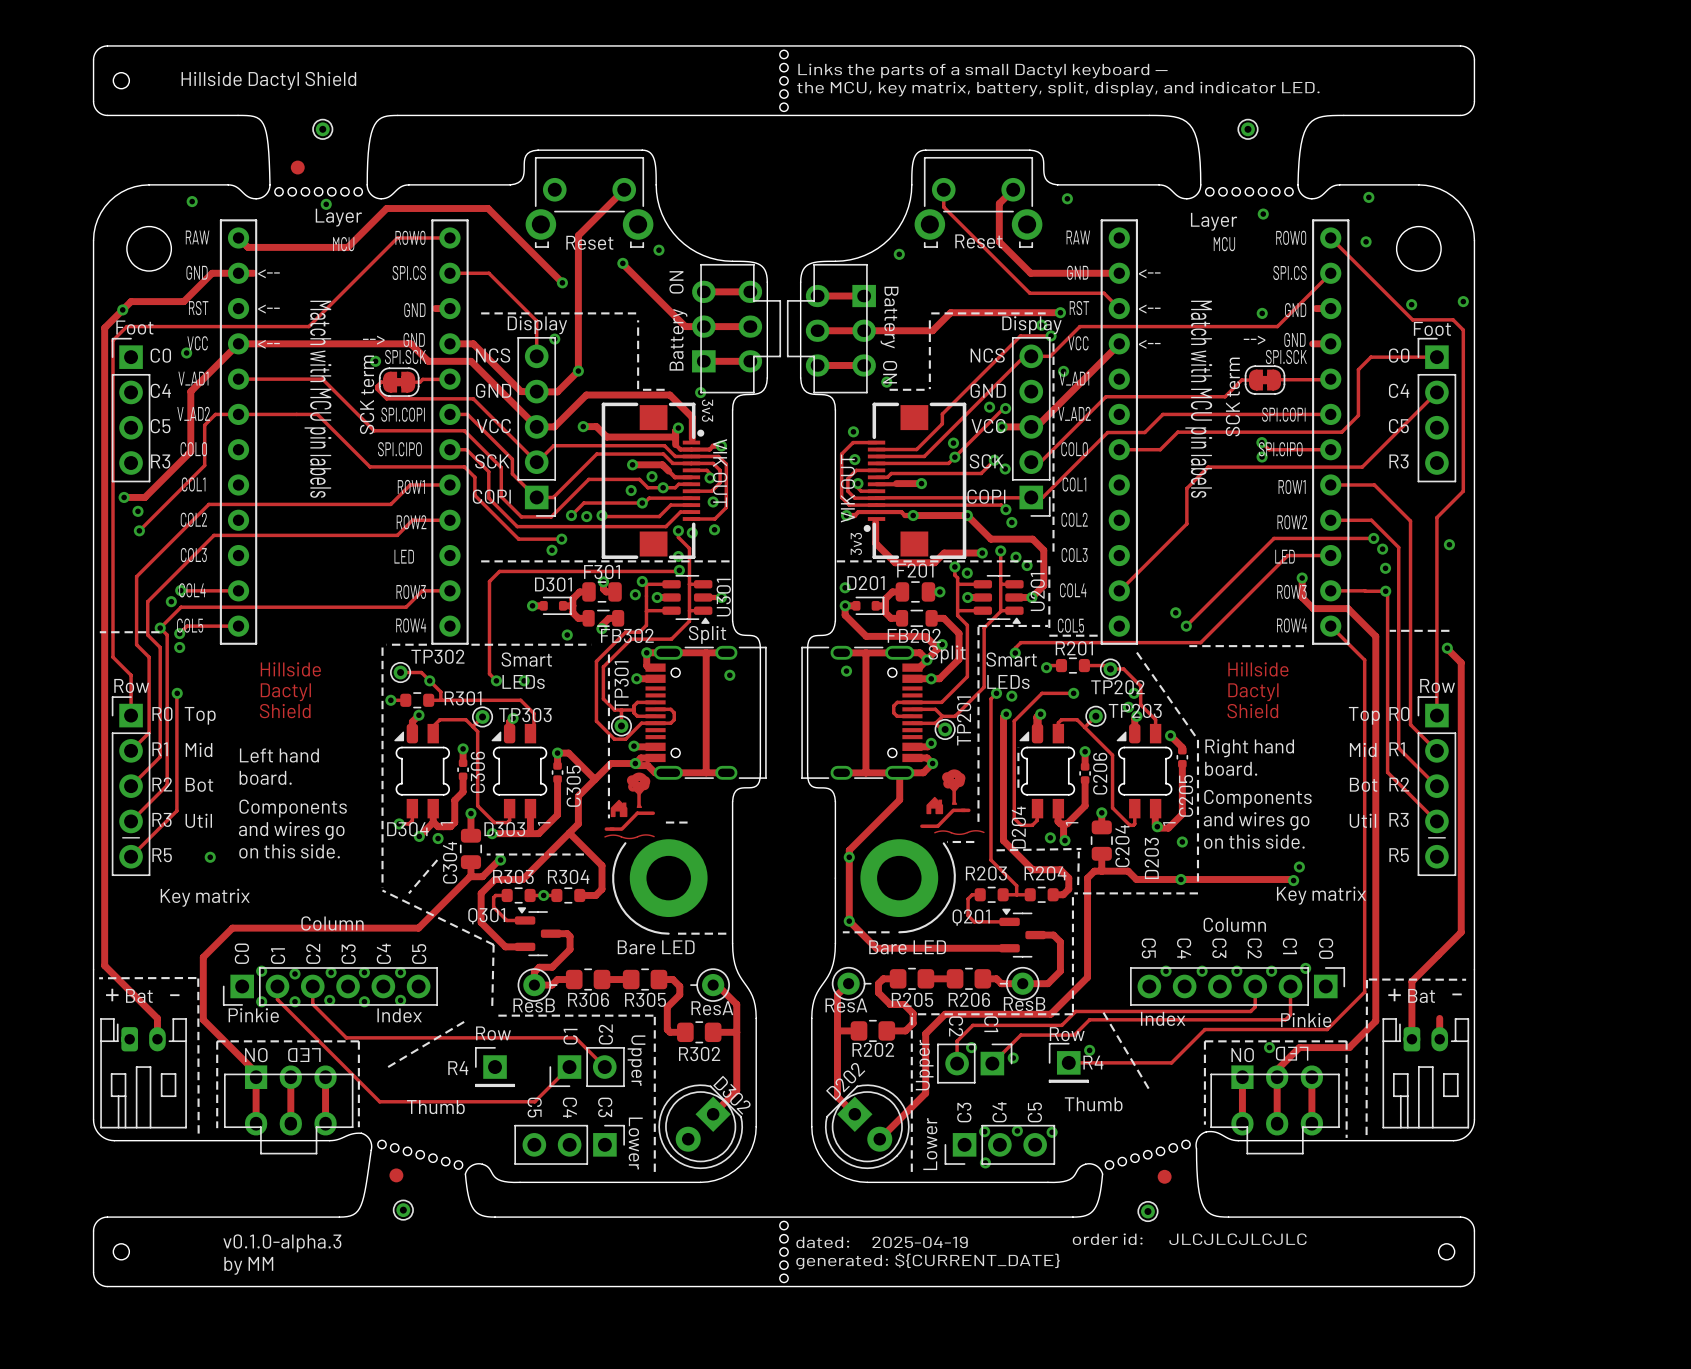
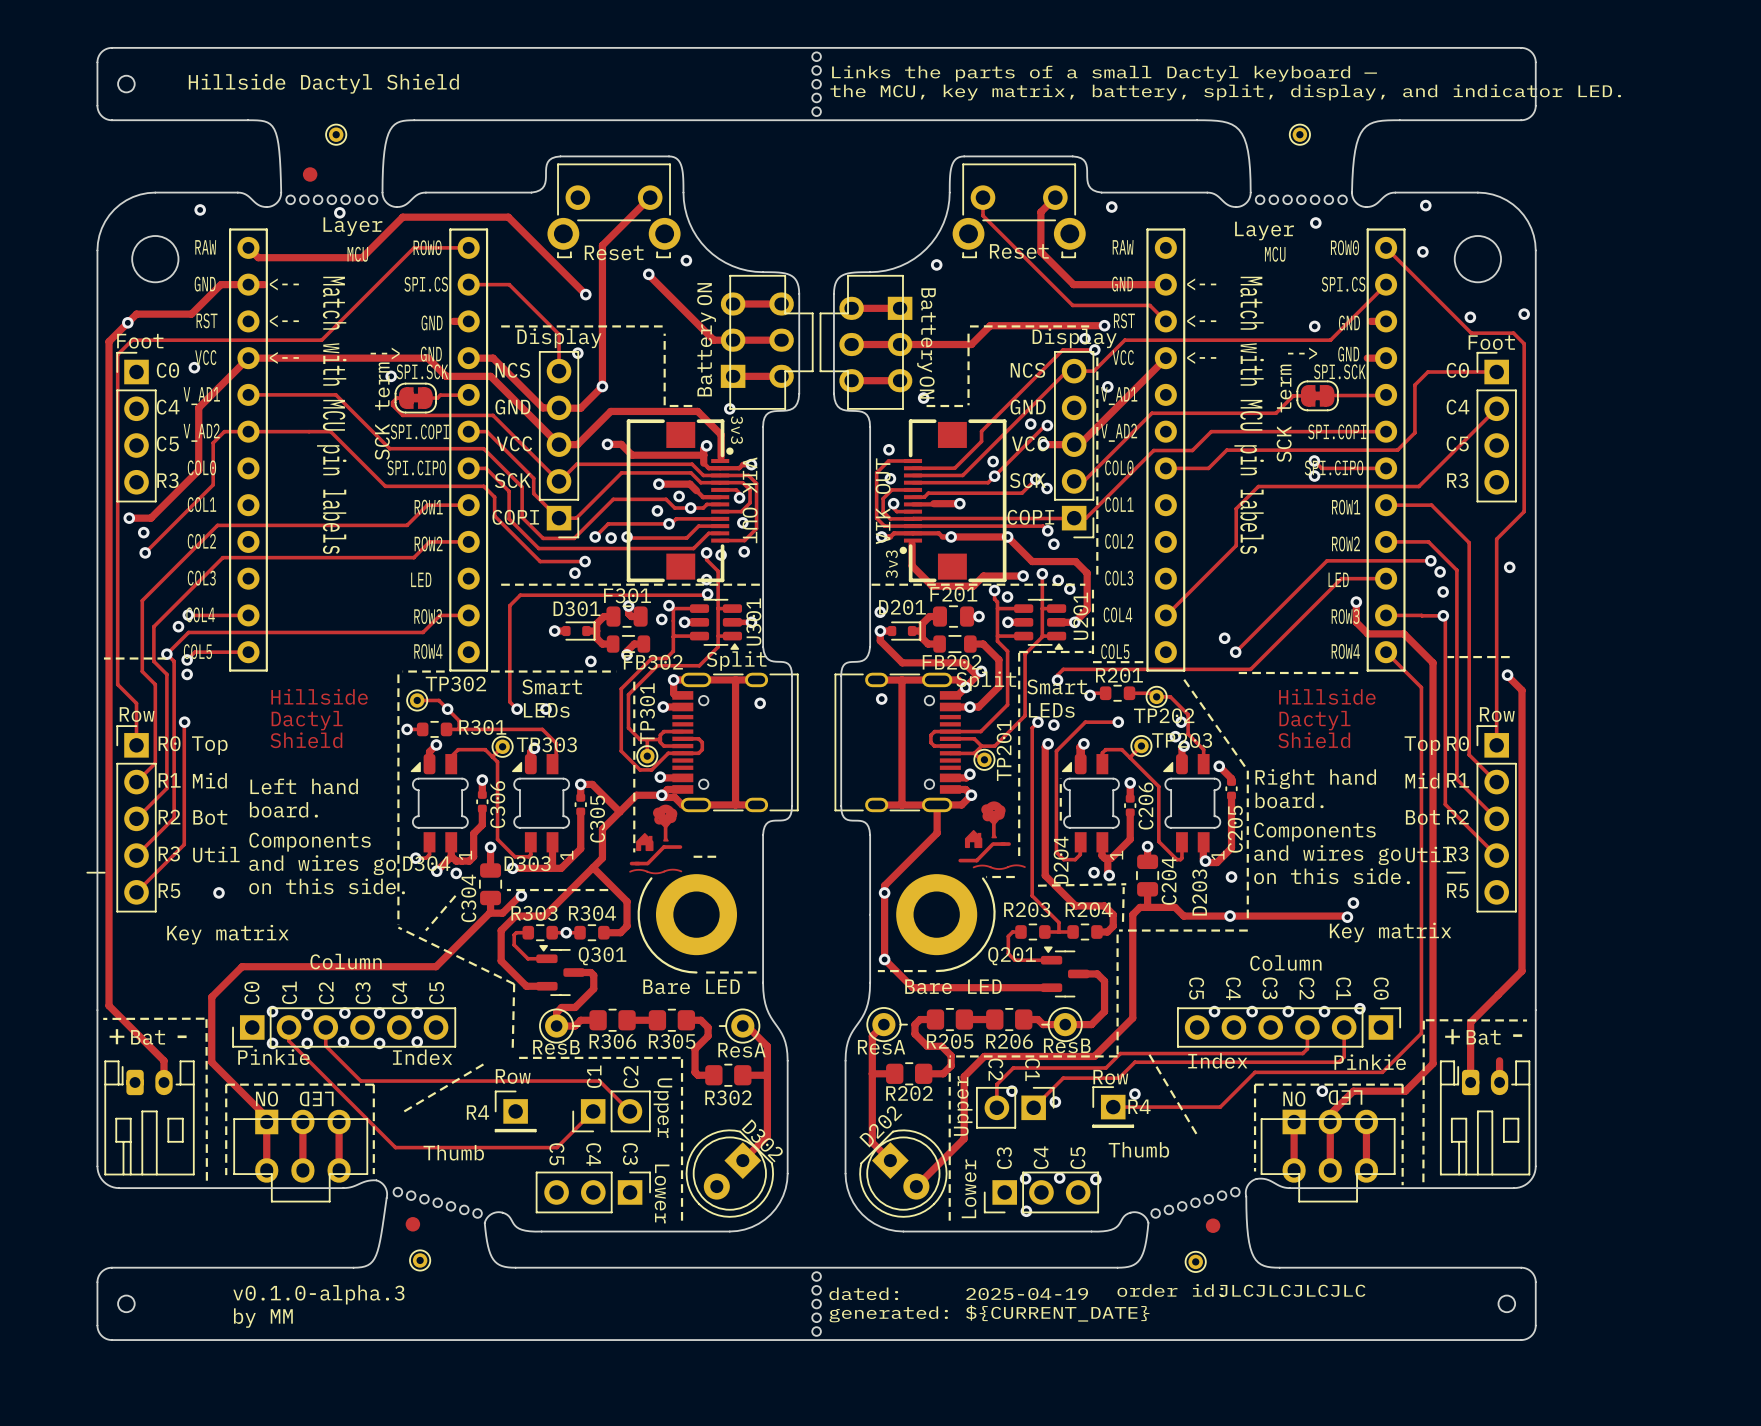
part: none -> Row (121, 818)
part: Row (131, 786) -> none
part: none -> Row (1481, 818)
part: Row (1436, 786) -> none
Q301 name position: Q301 (486, 916) -> Q301 (602, 956)

